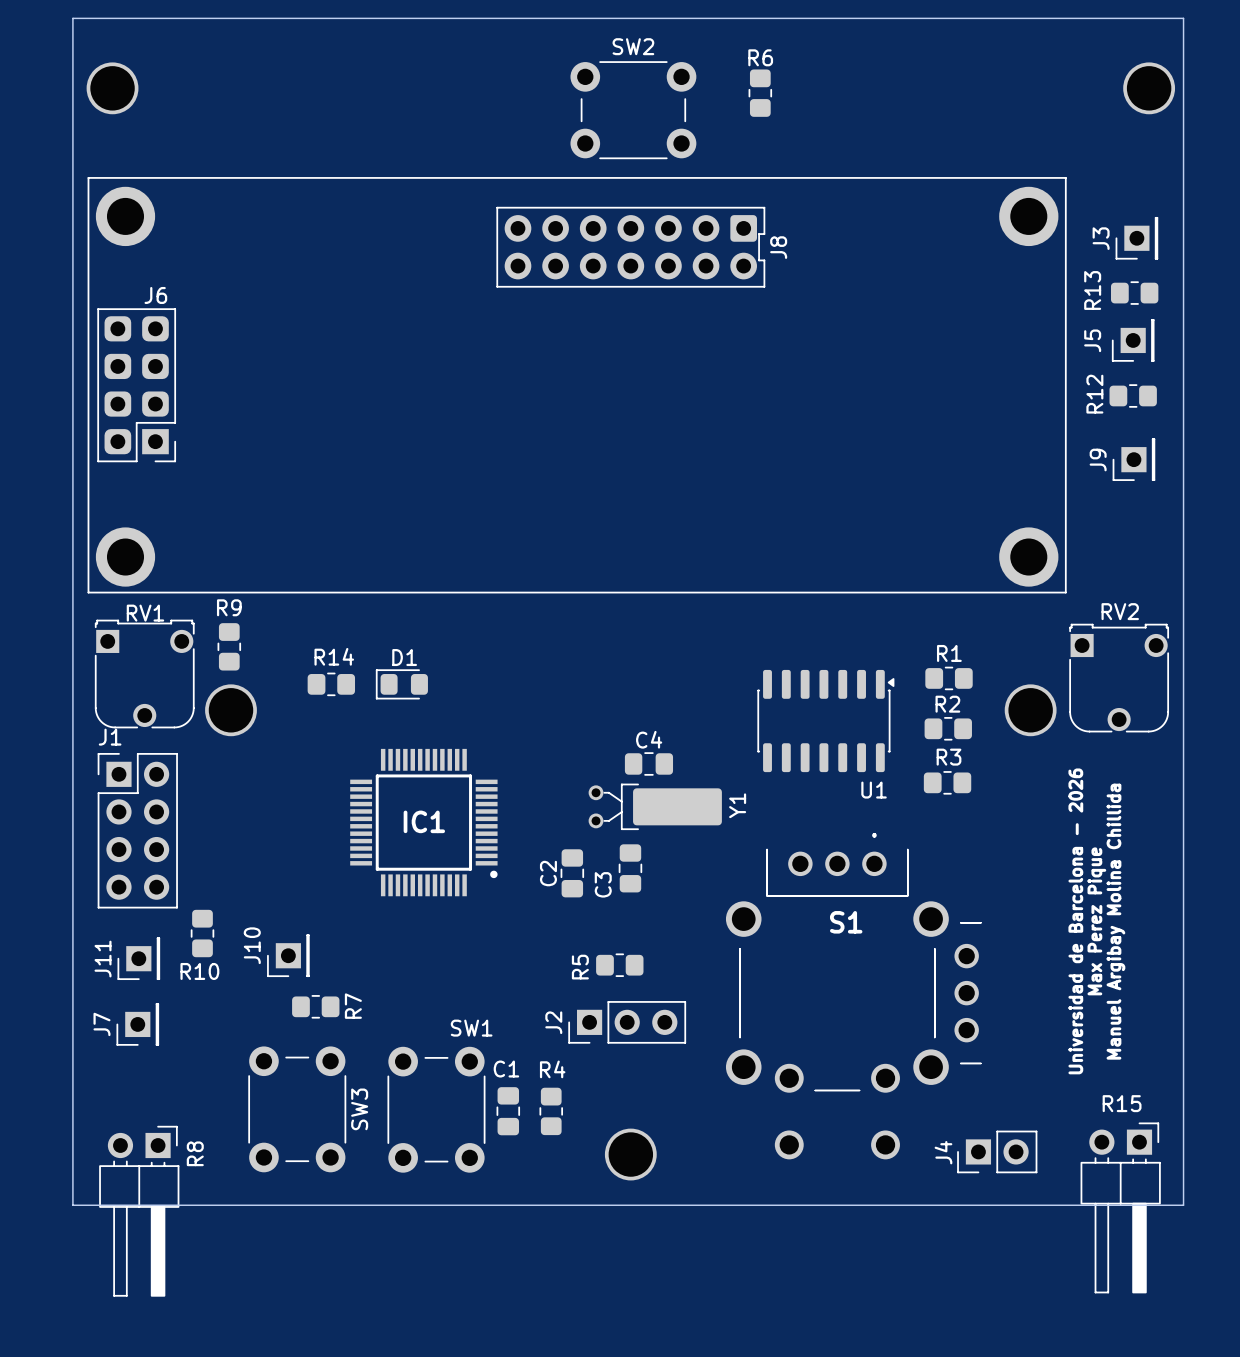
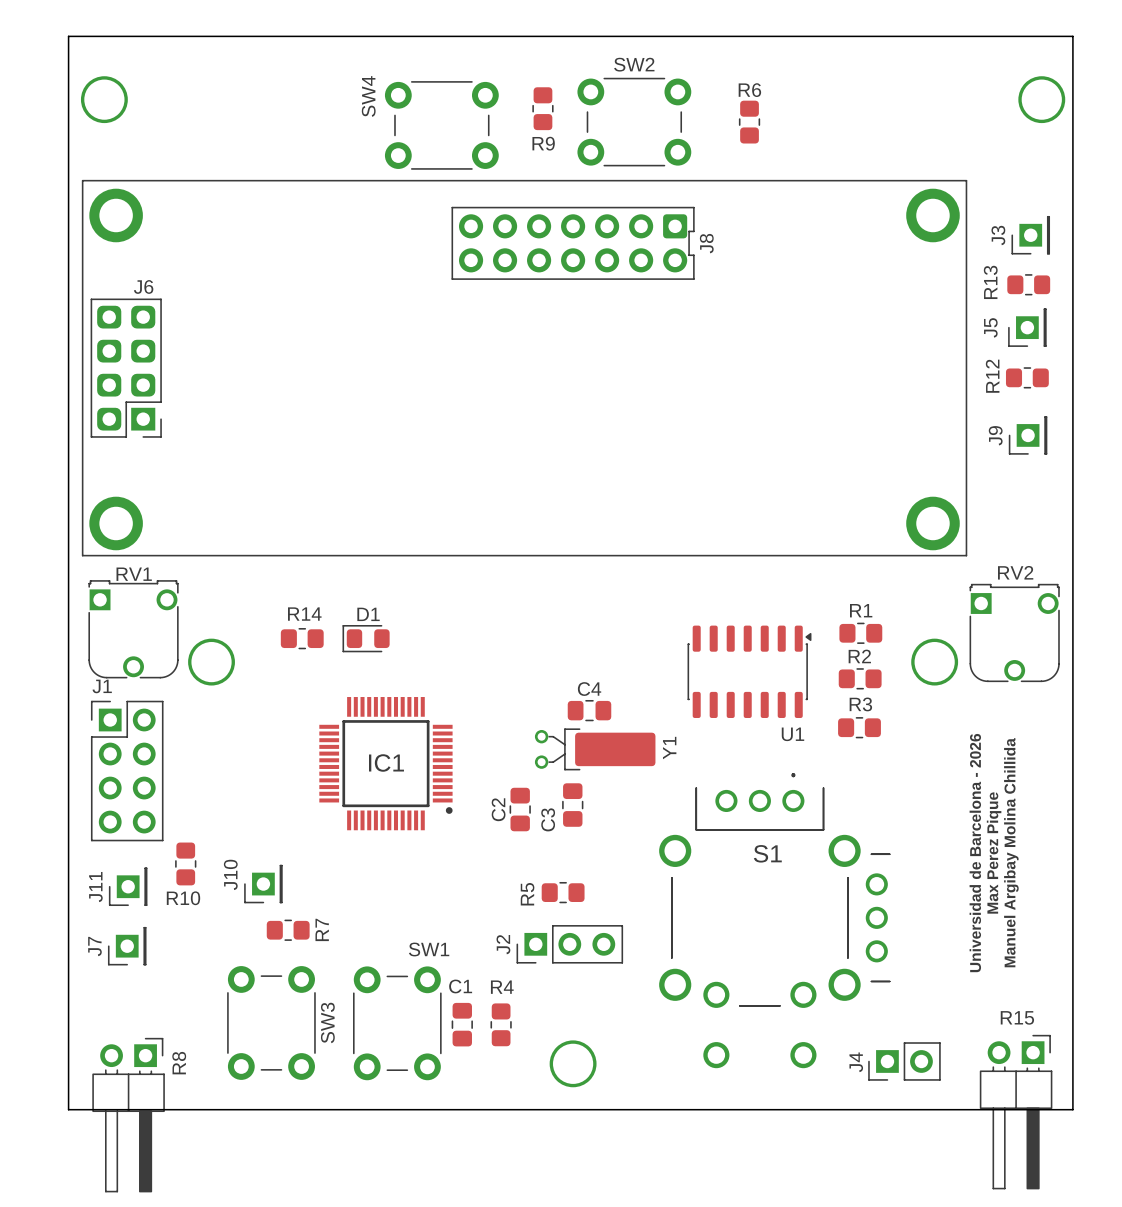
R6 position: (760, 93) -> (749, 122)
SW2 position: (633, 110) -> (634, 122)
SW4: none -> (441, 125)
R9 name position: R9 (229, 607) -> R9 (543, 143)
R9 position: (229, 646) -> (542, 108)

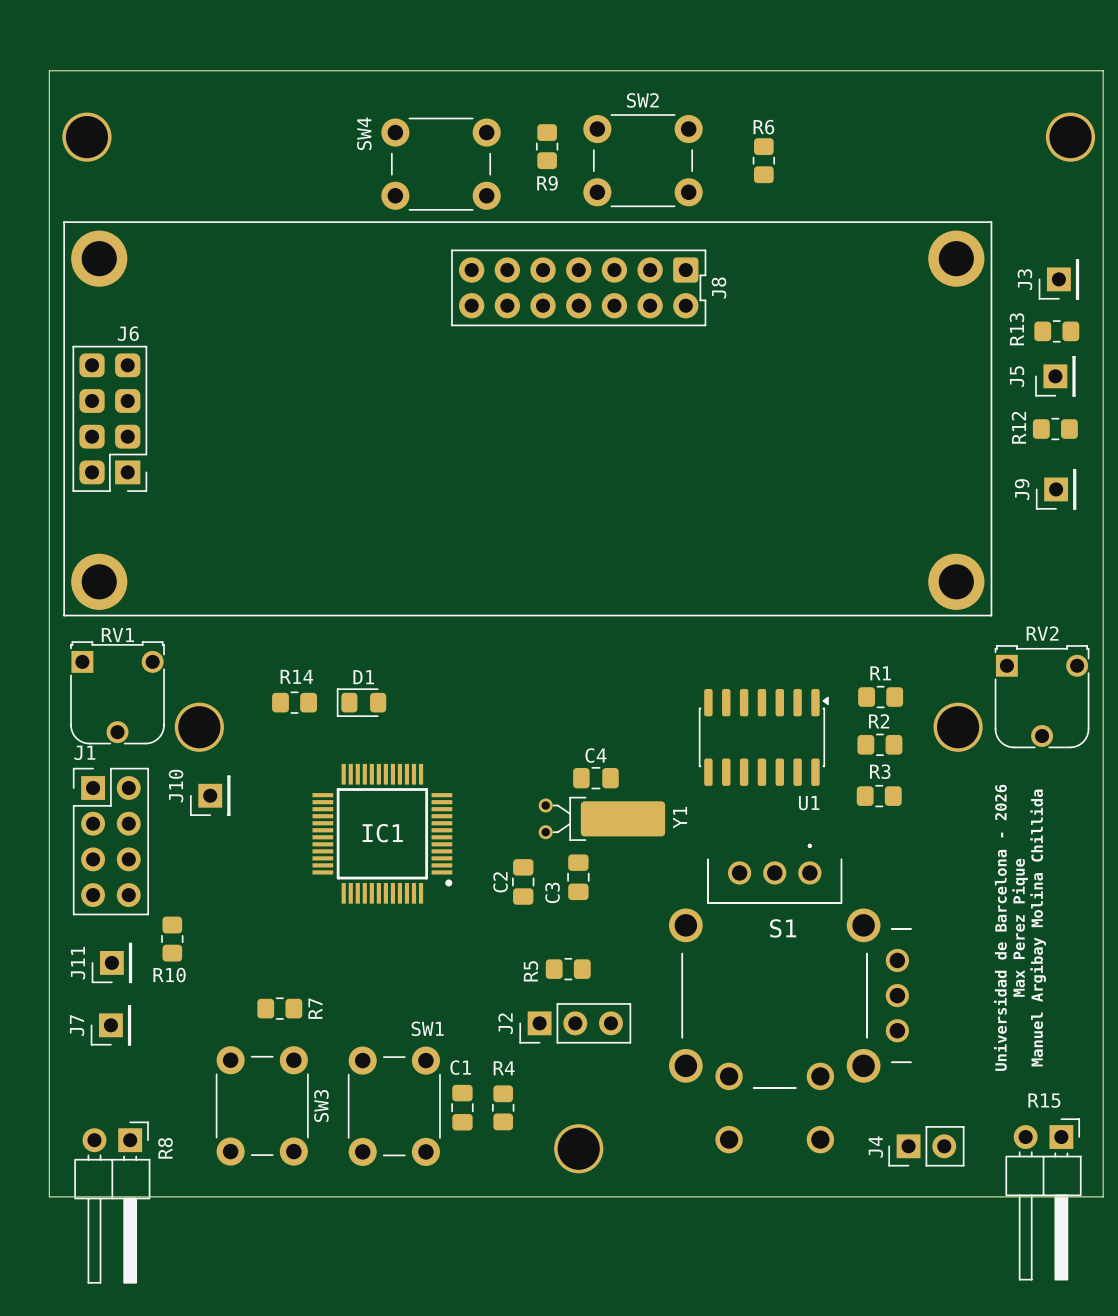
J10 position: (263, 884) -> (210, 795)

